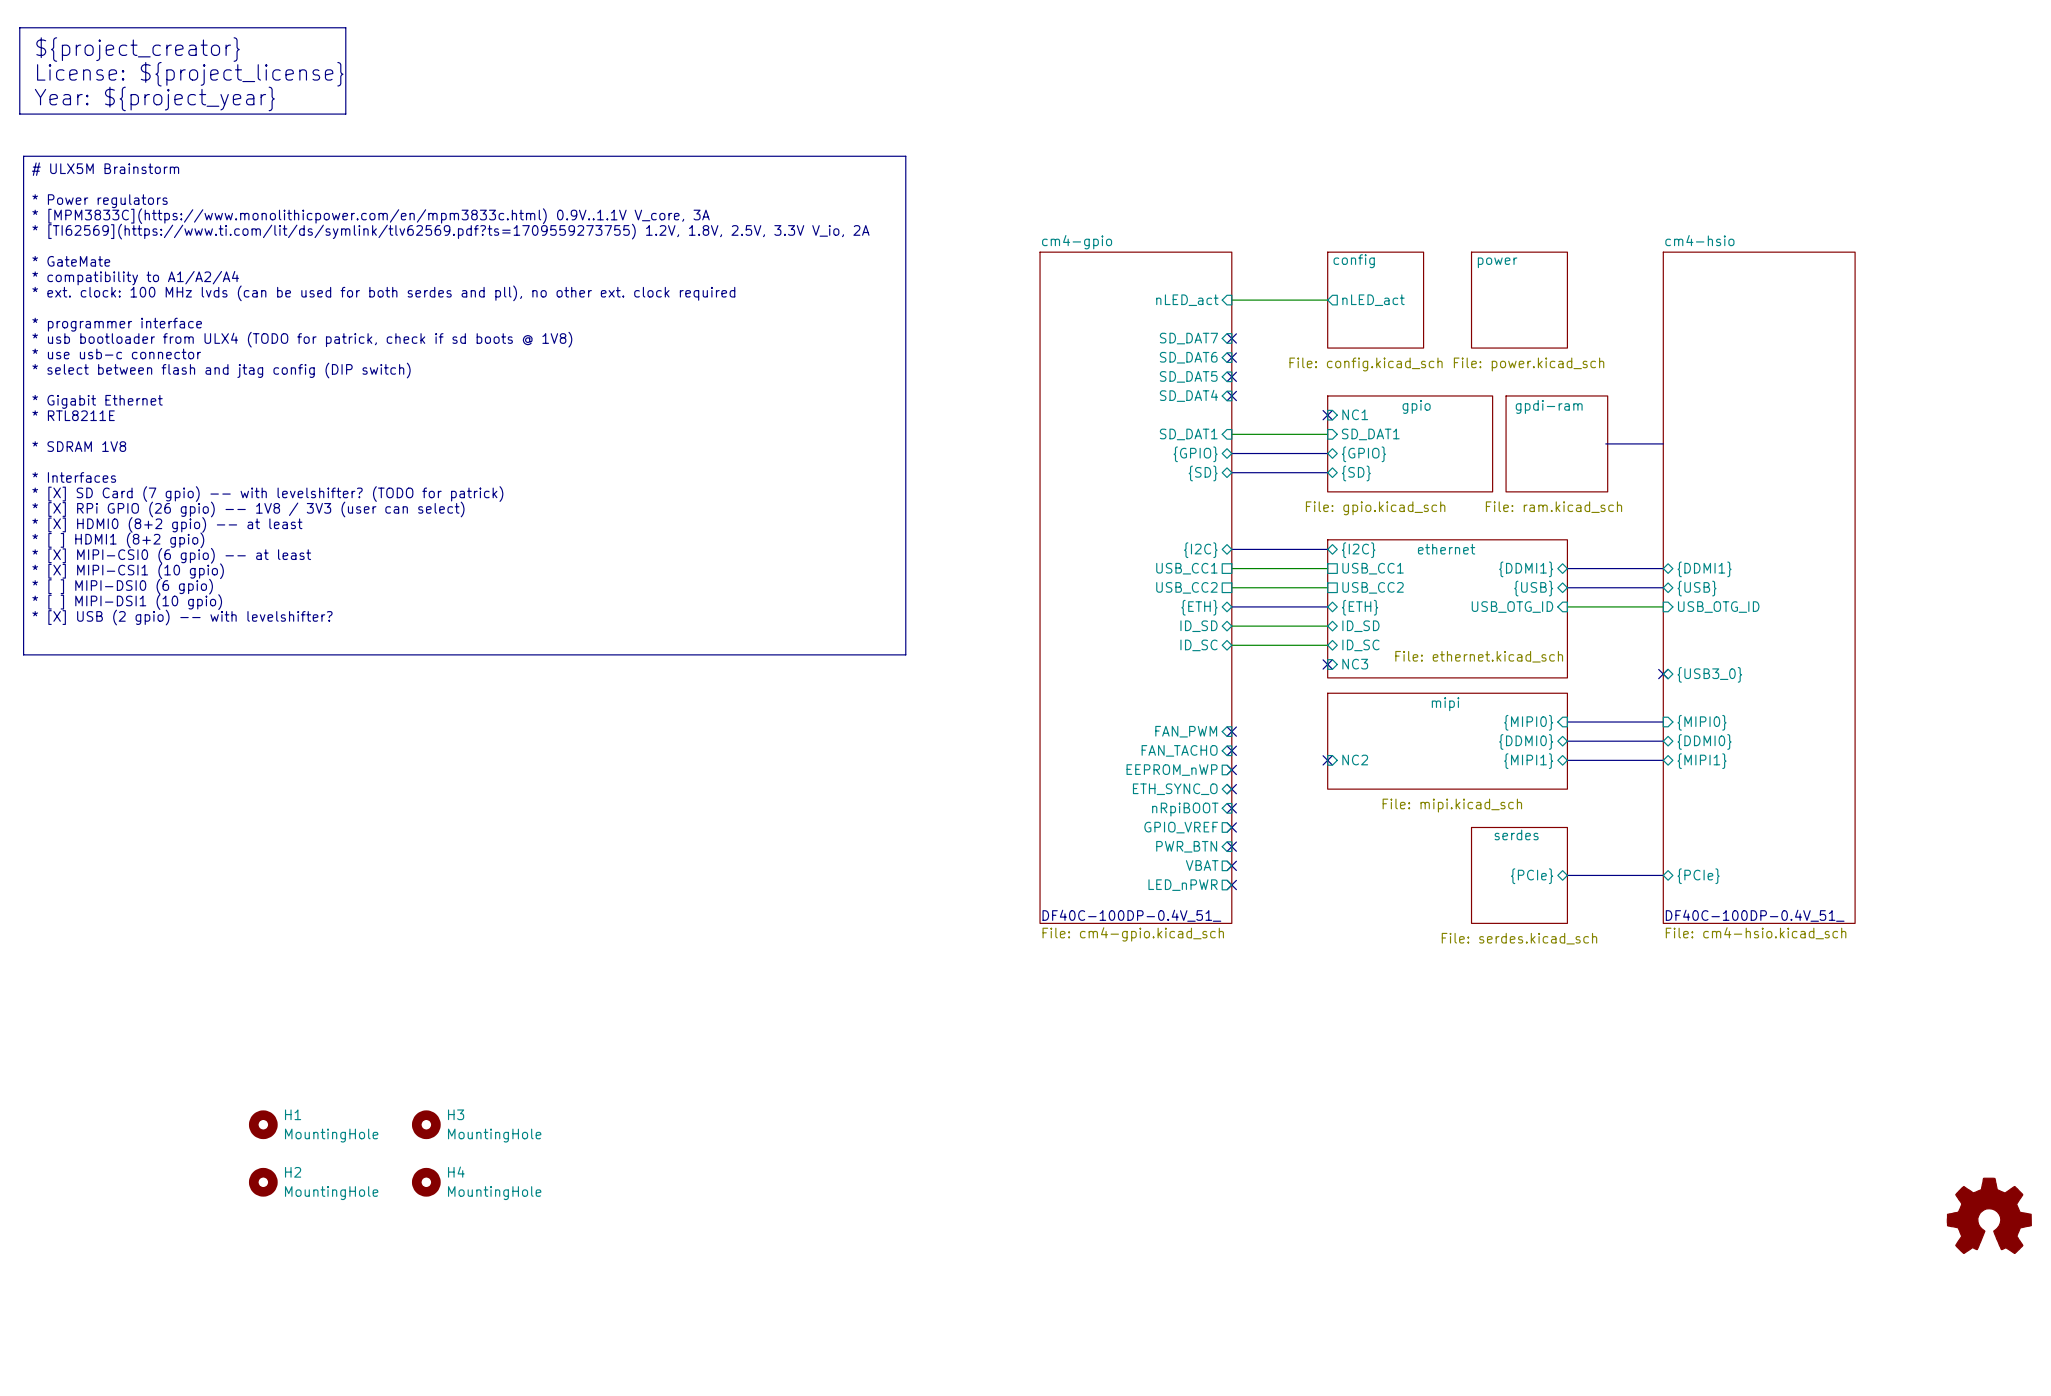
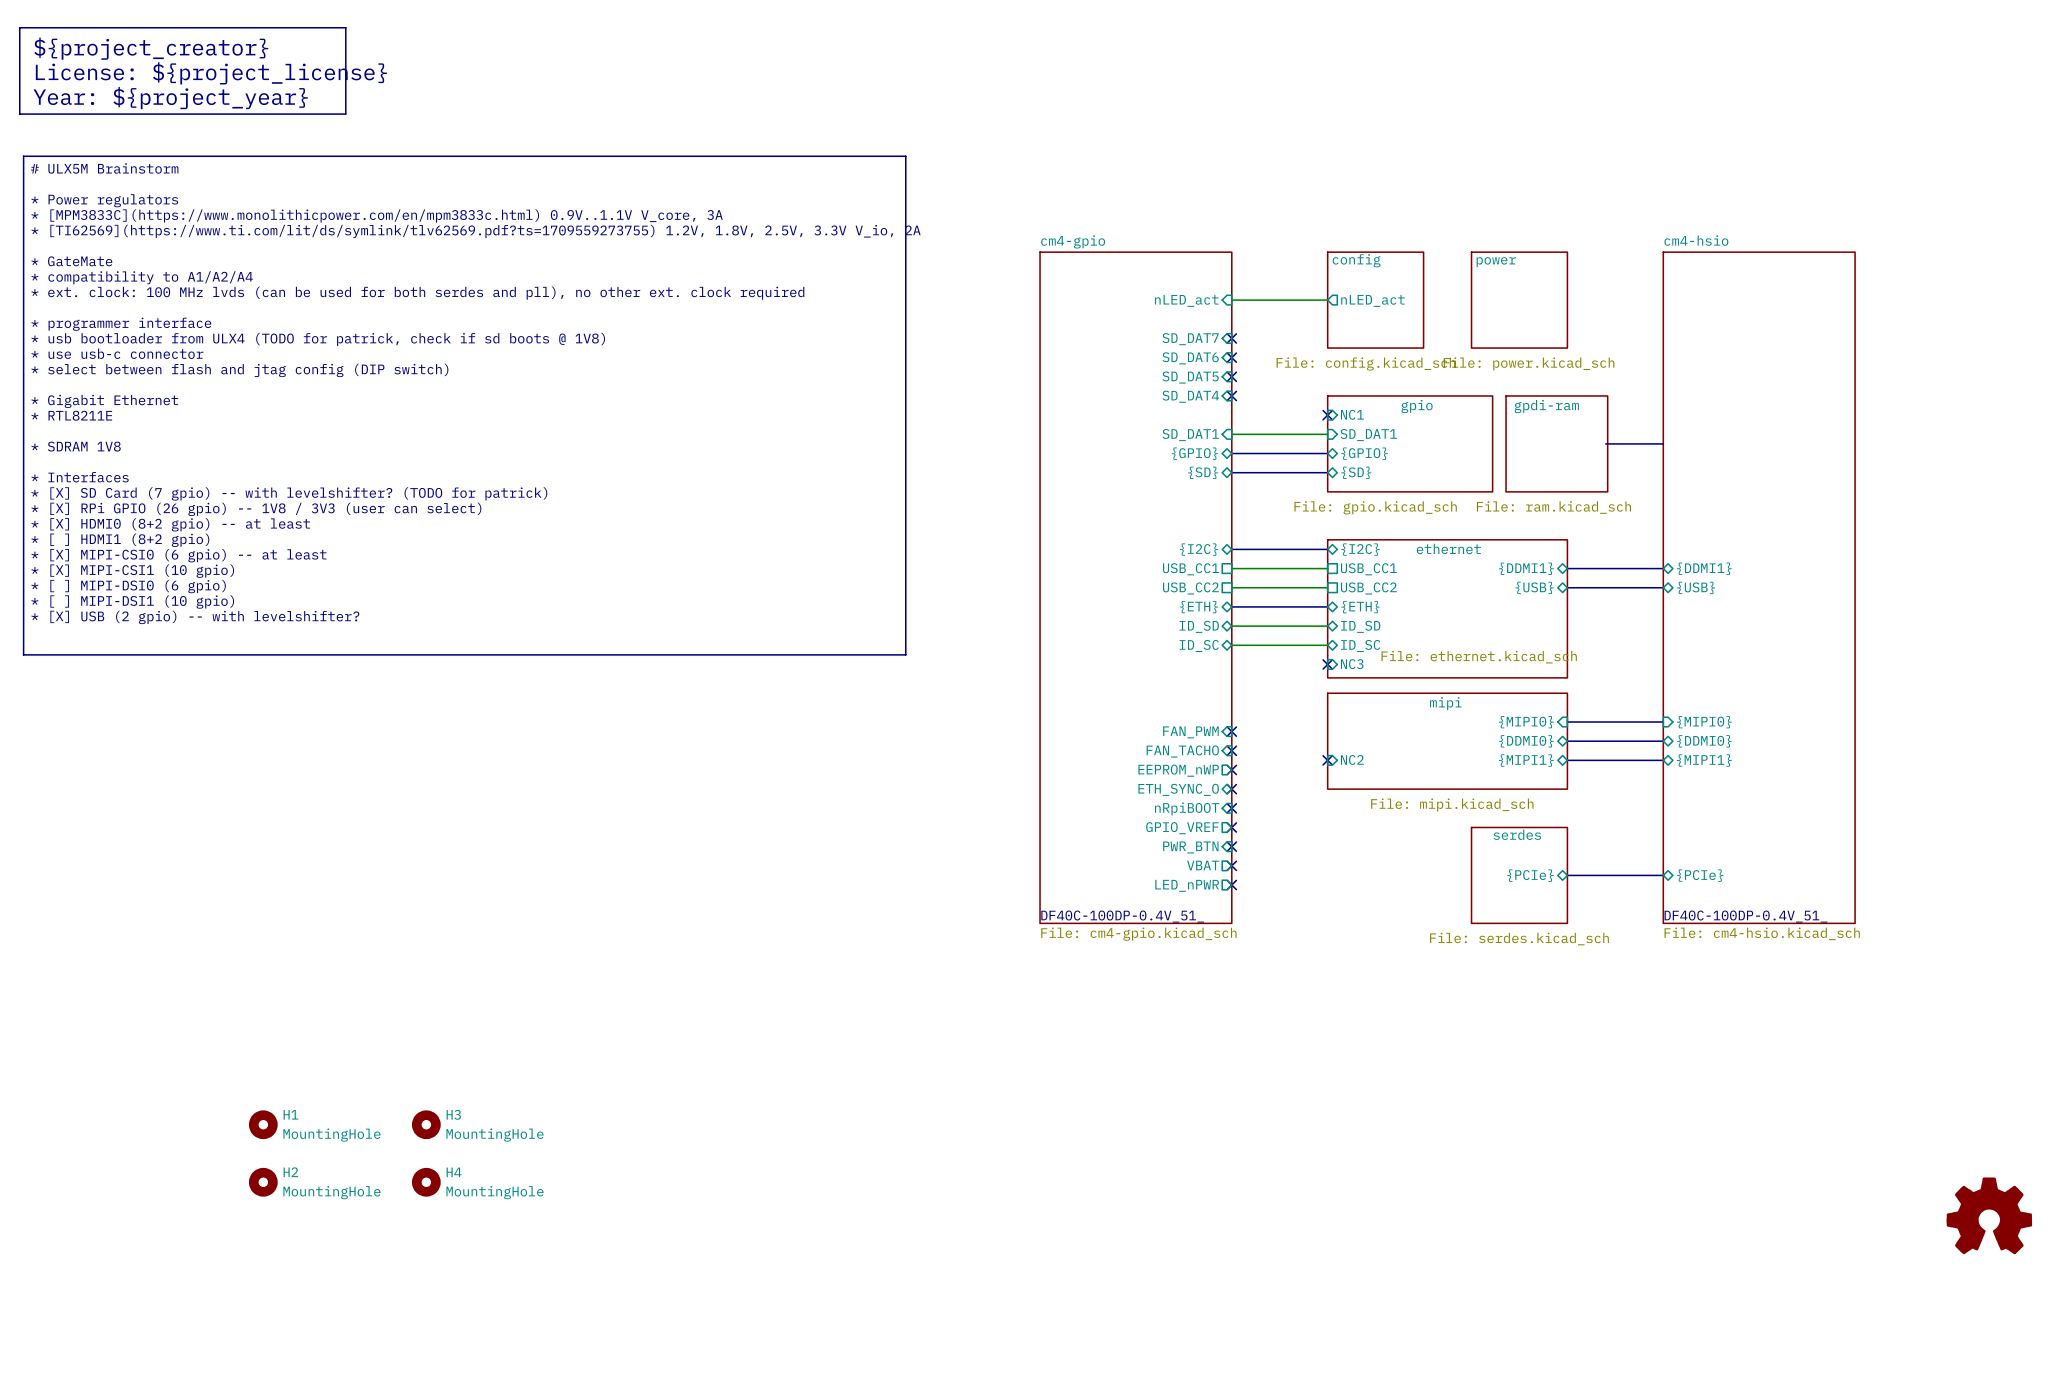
wire: (1567, 606) (1663, 606) -> none
sheet pin: USB_OTG_ID (1512, 607) -> none
sheet pin: USB_OTG_ID (1718, 607) -> none
no-connect mark: (1663, 674) -> none
sheet pin: {USB3_0} (1709, 674) -> none

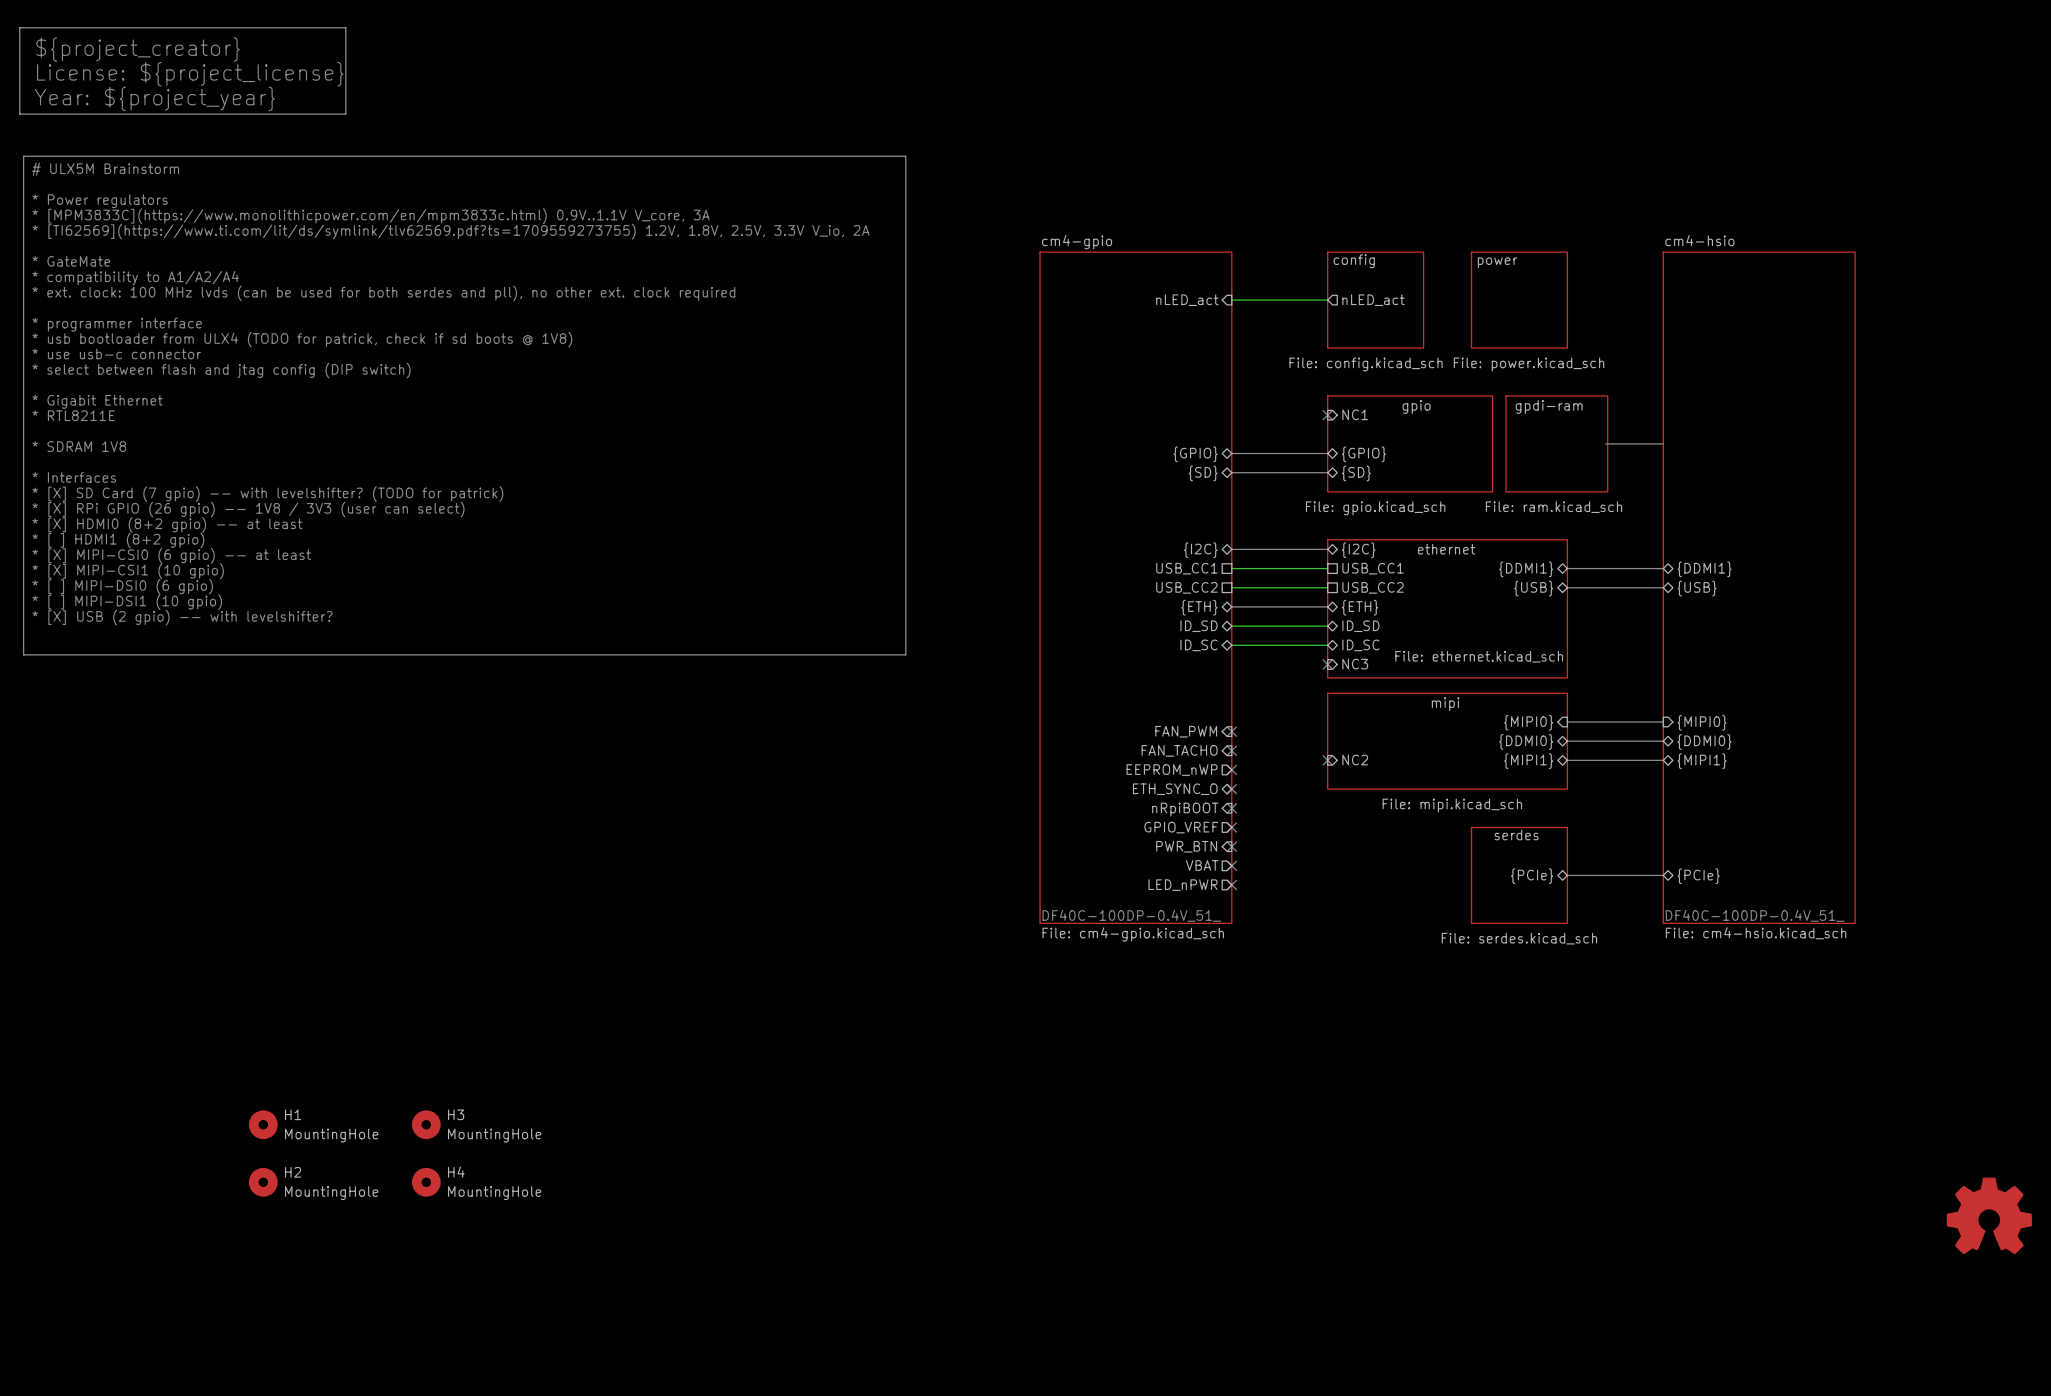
no-connect mark: (1231, 338) -> none
sheet pin: SD_DAT7 (1190, 339) -> none
no-connect mark: (1231, 357) -> none
sheet pin: SD_DAT6 (1190, 358) -> none
no-connect mark: (1231, 376) -> none
sheet pin: SD_DAT5 (1190, 377) -> none
no-connect mark: (1231, 395) -> none
sheet pin: SD_DAT4 (1190, 396) -> none
wire: (1231, 434) (1327, 434) -> none
sheet pin: SD_DAT1 (1190, 435) -> none
sheet pin: SD_DAT1 (1368, 435) -> none

